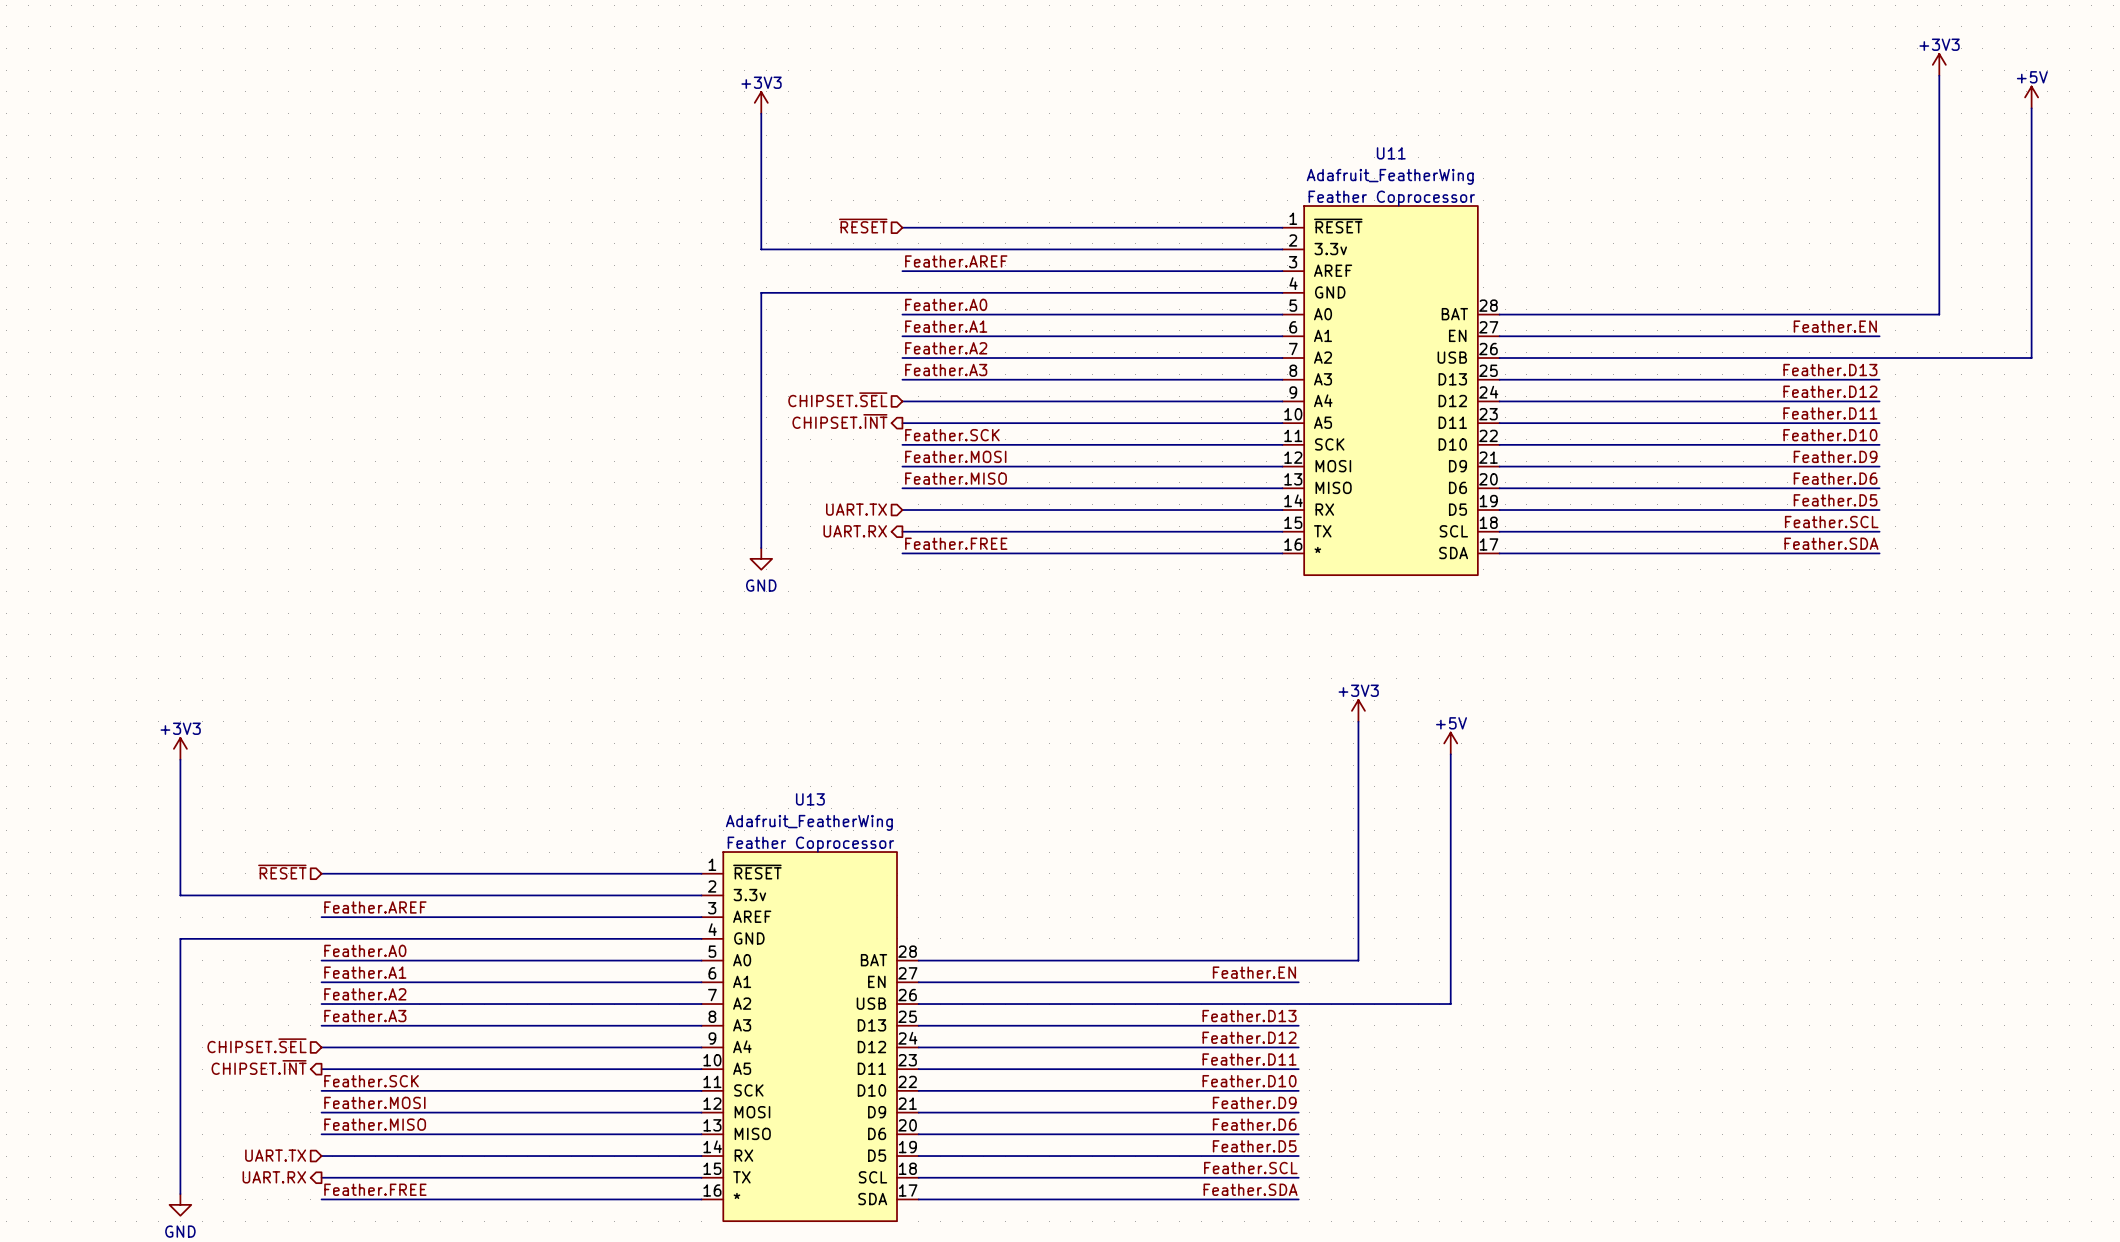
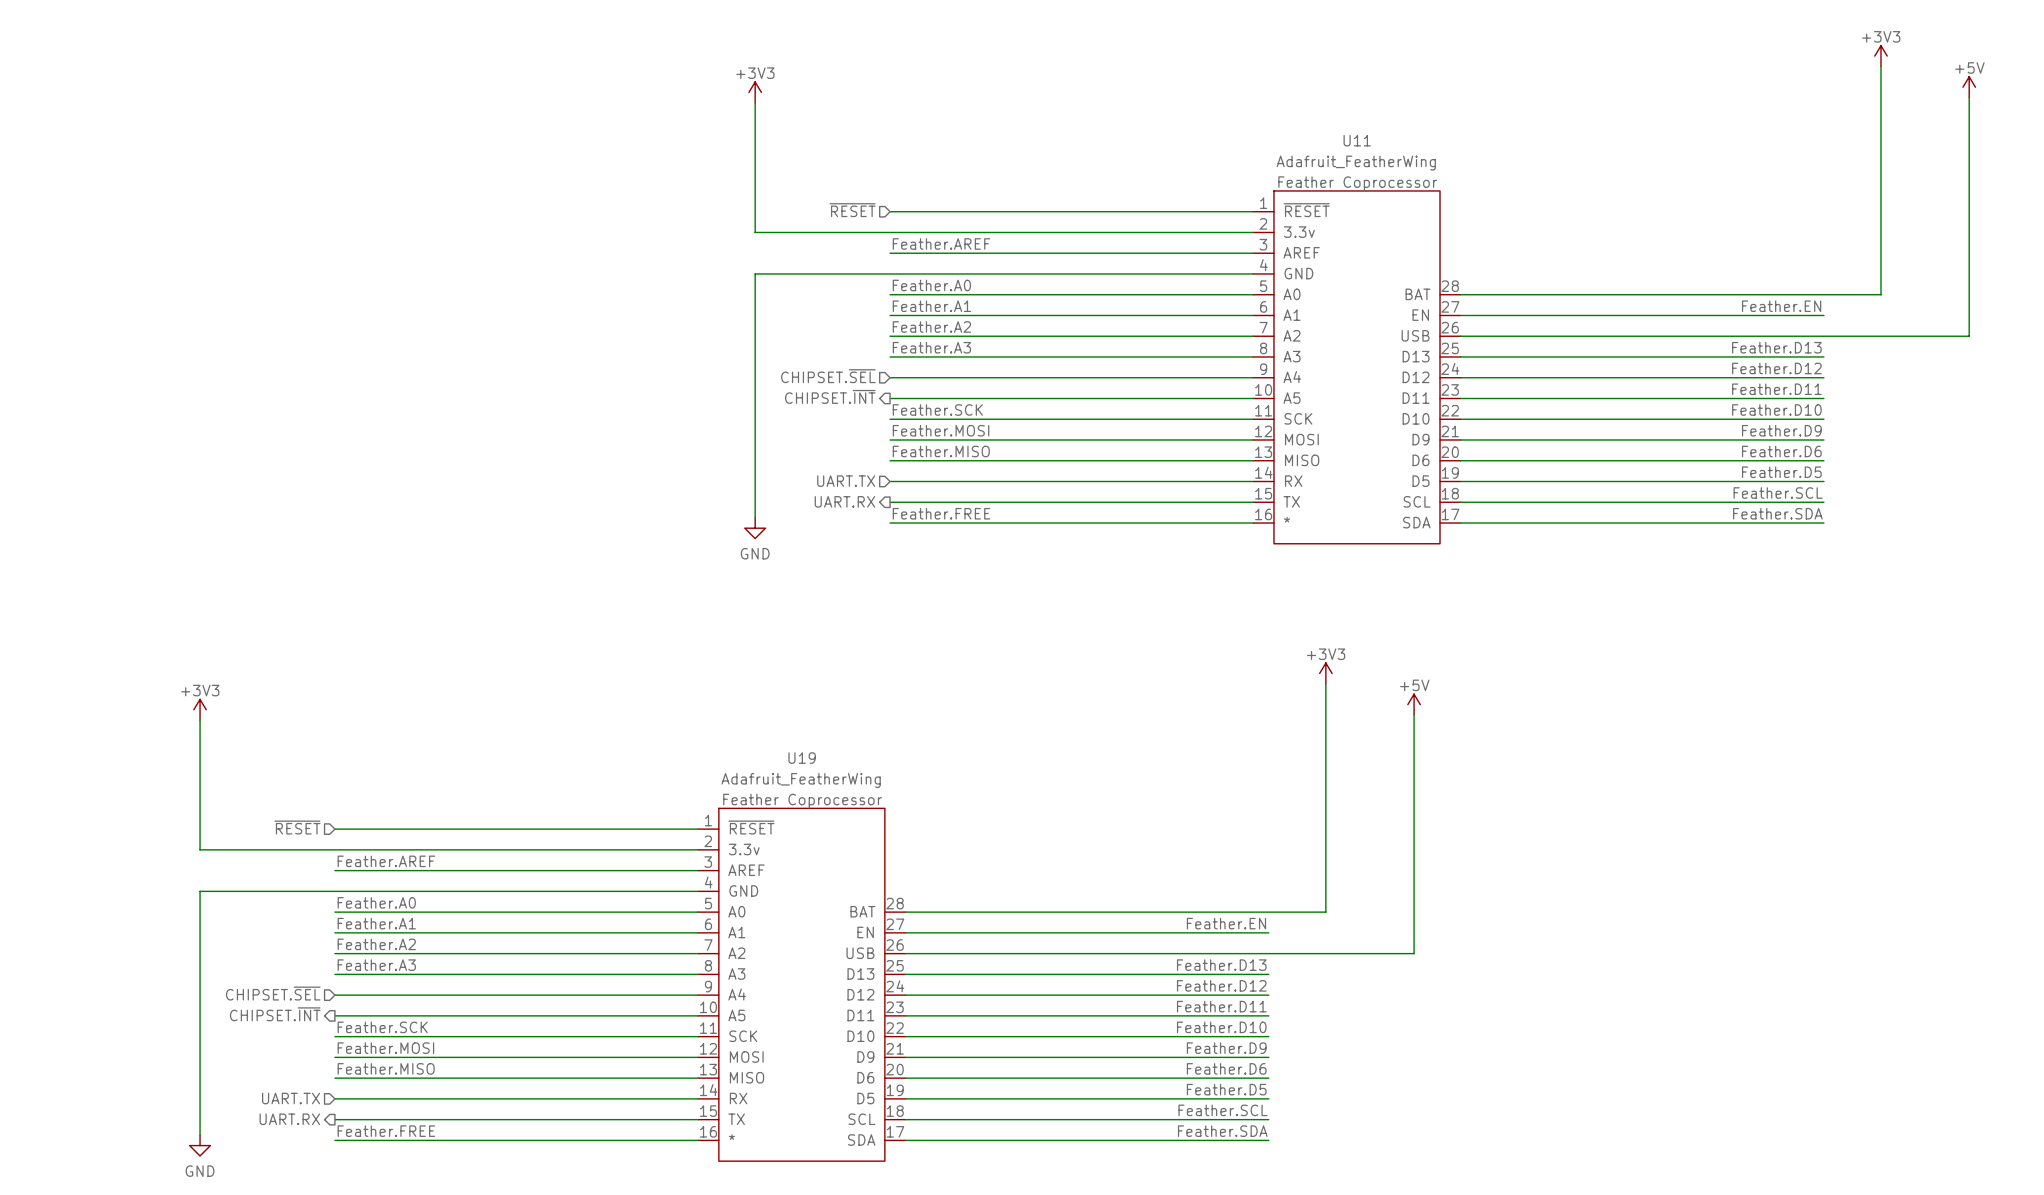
U13 name: U13 (810, 799) -> U19 (802, 758)

